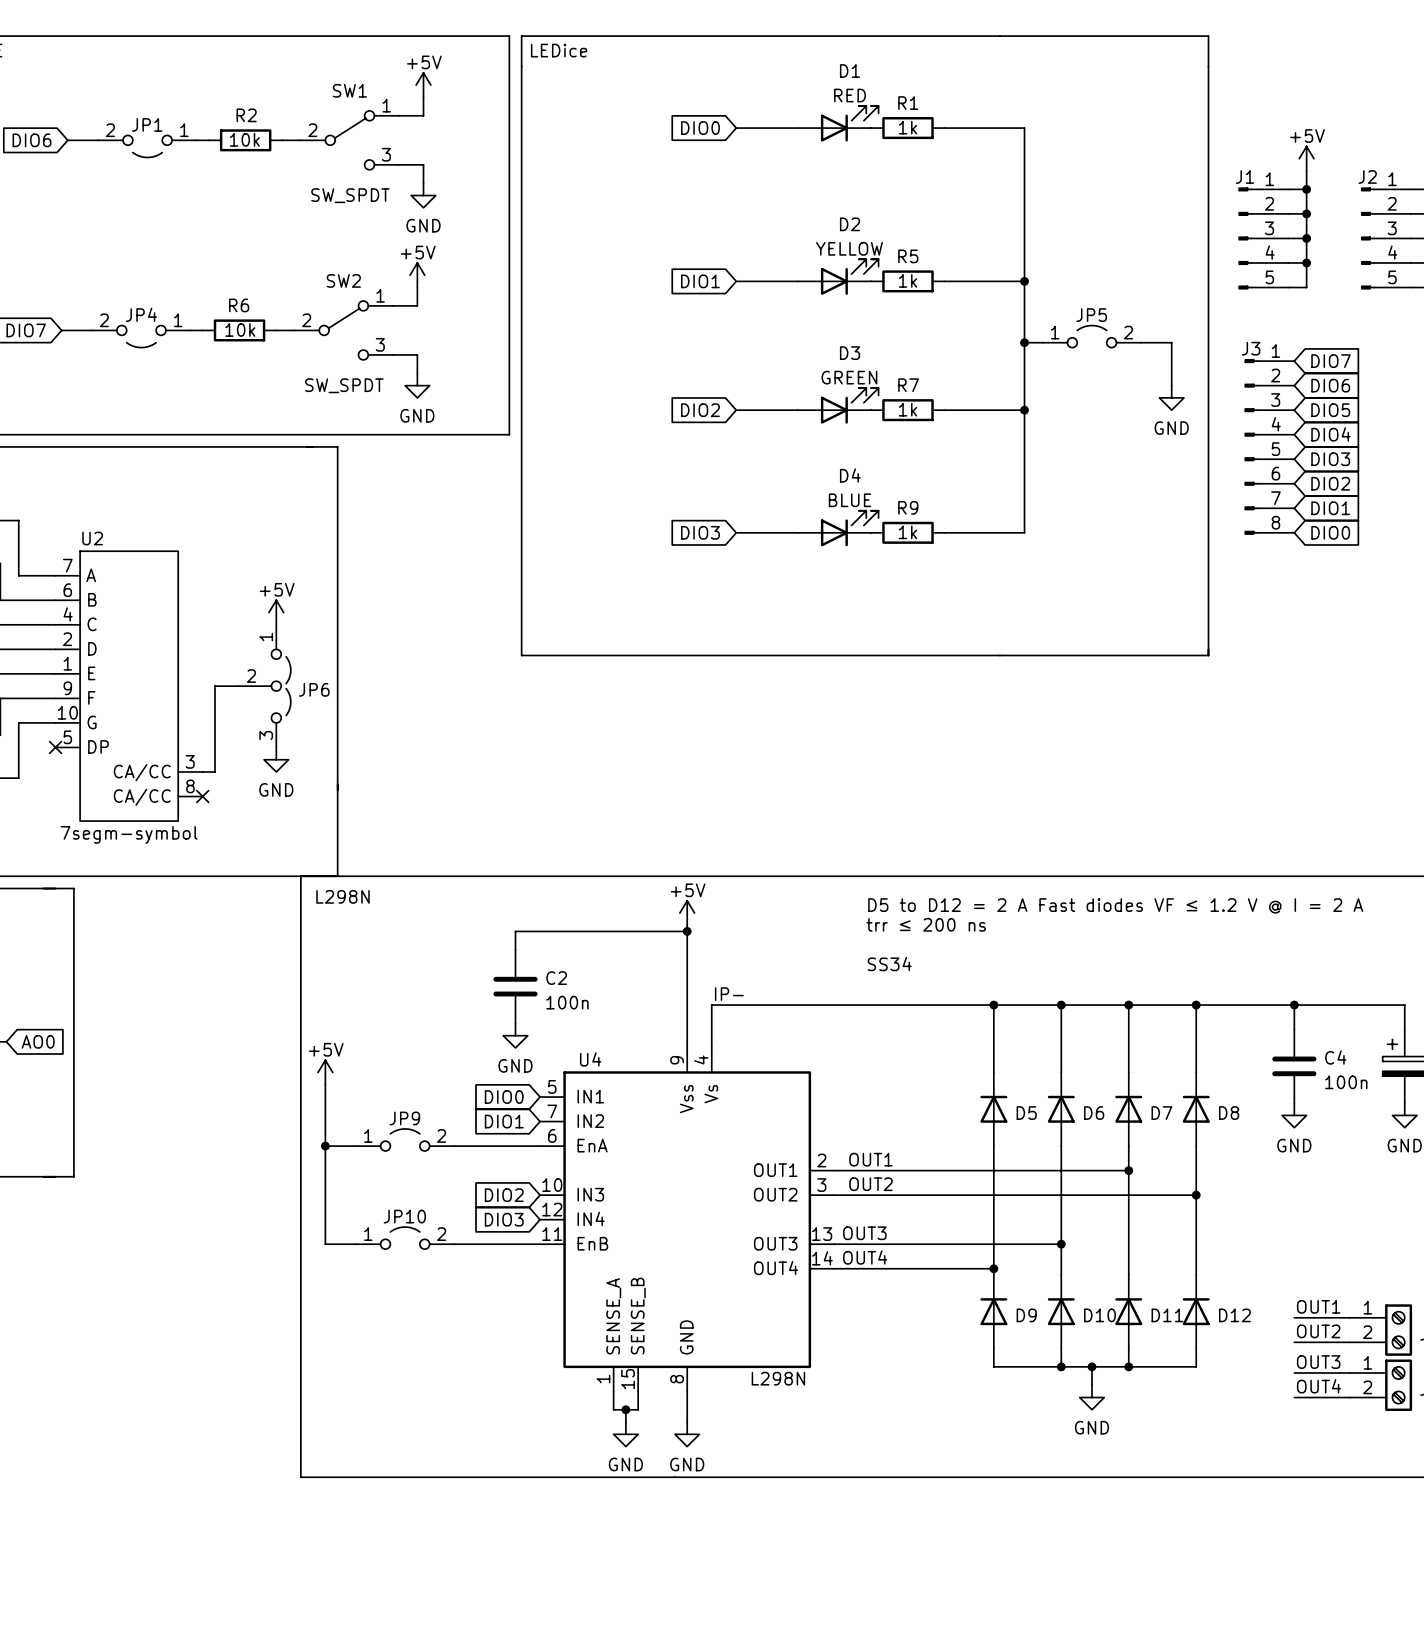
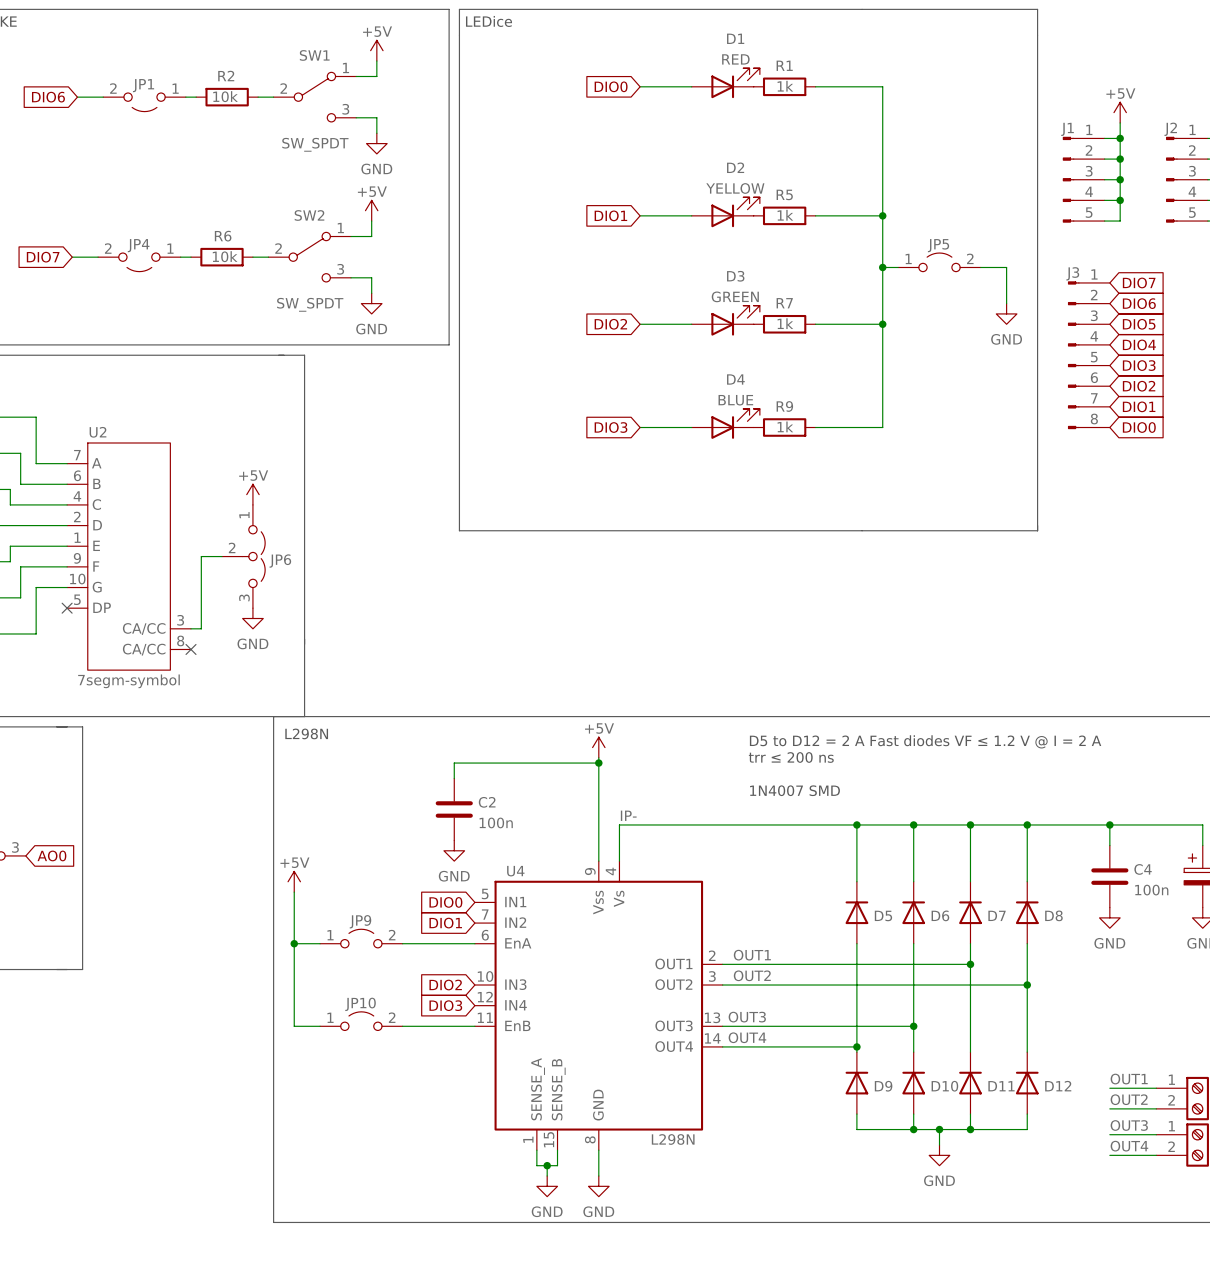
text: SS34 (889, 964) -> 1N4007 SMD (794, 790)

